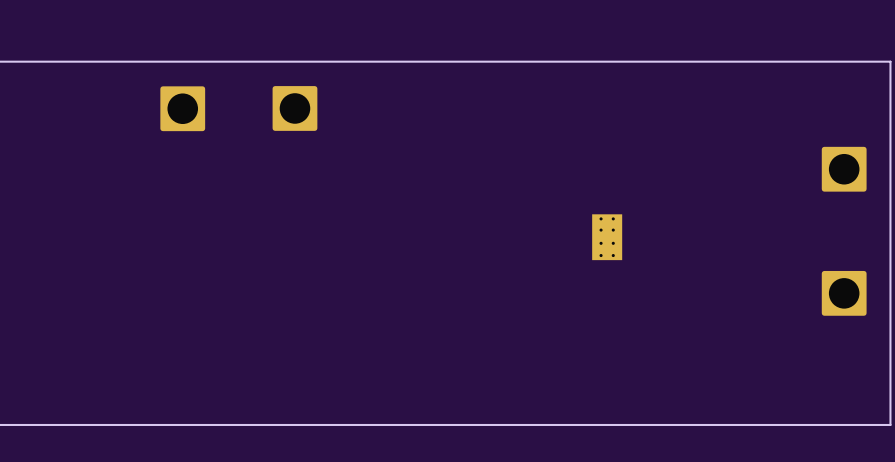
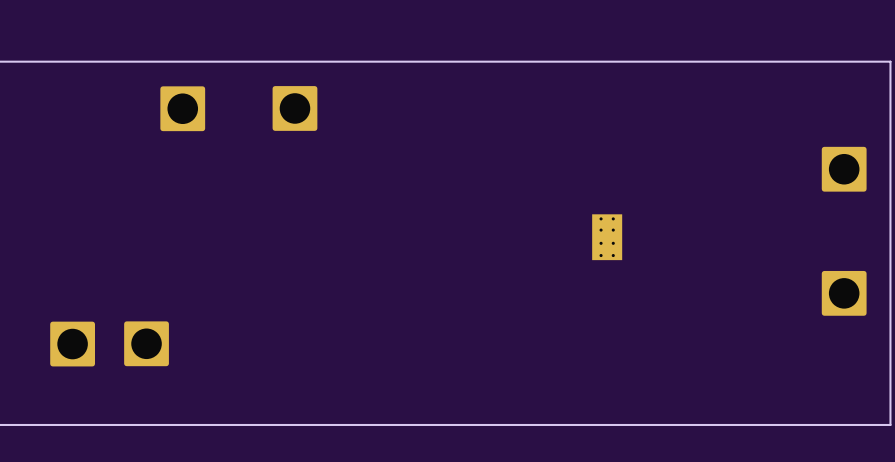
part: none -> (146, 343)
part: none -> (72, 344)

